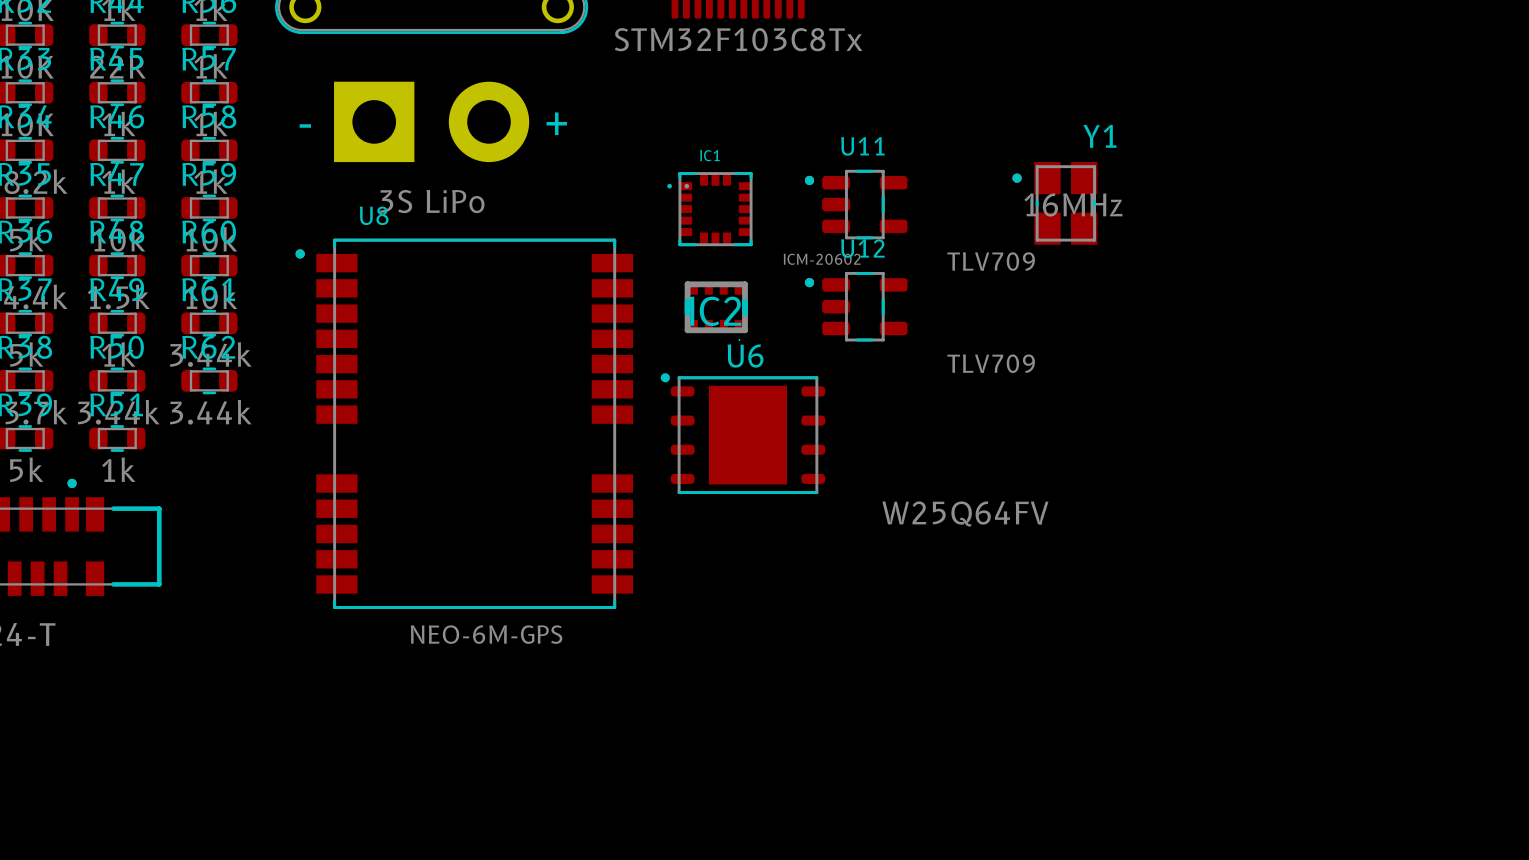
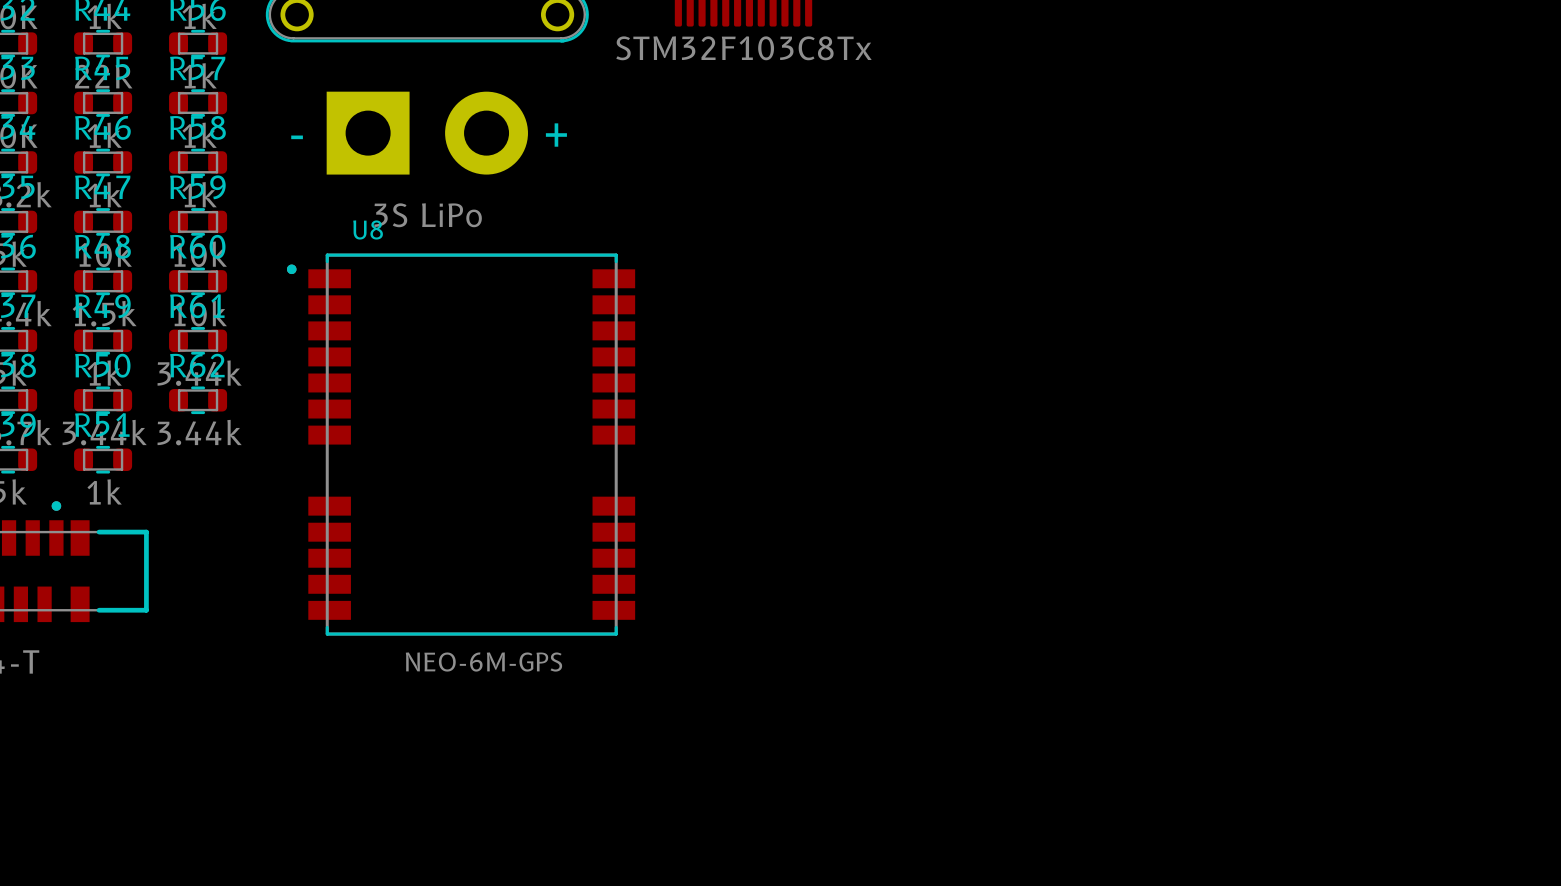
Y1: 16MHz (1054, 203) -> none
U11: TLV709 (856, 204) -> none
IC1: ICM-20602 (709, 209) -> none
U12: TLV709 (856, 306) -> none
IC2: (716, 310) -> none
U6: W25Q64FV (742, 433) -> none

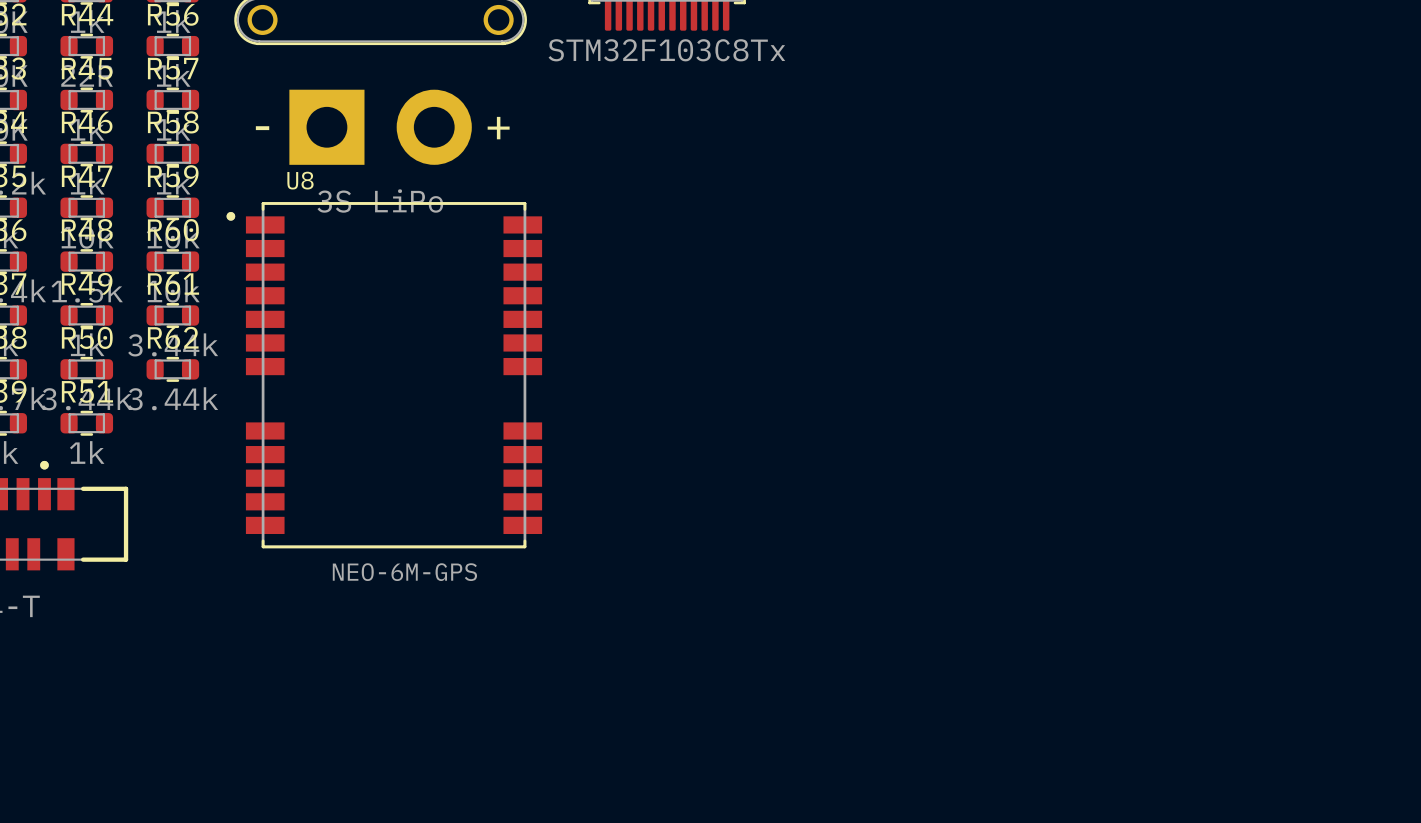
U8 position: (461, 444) -> (384, 375)

